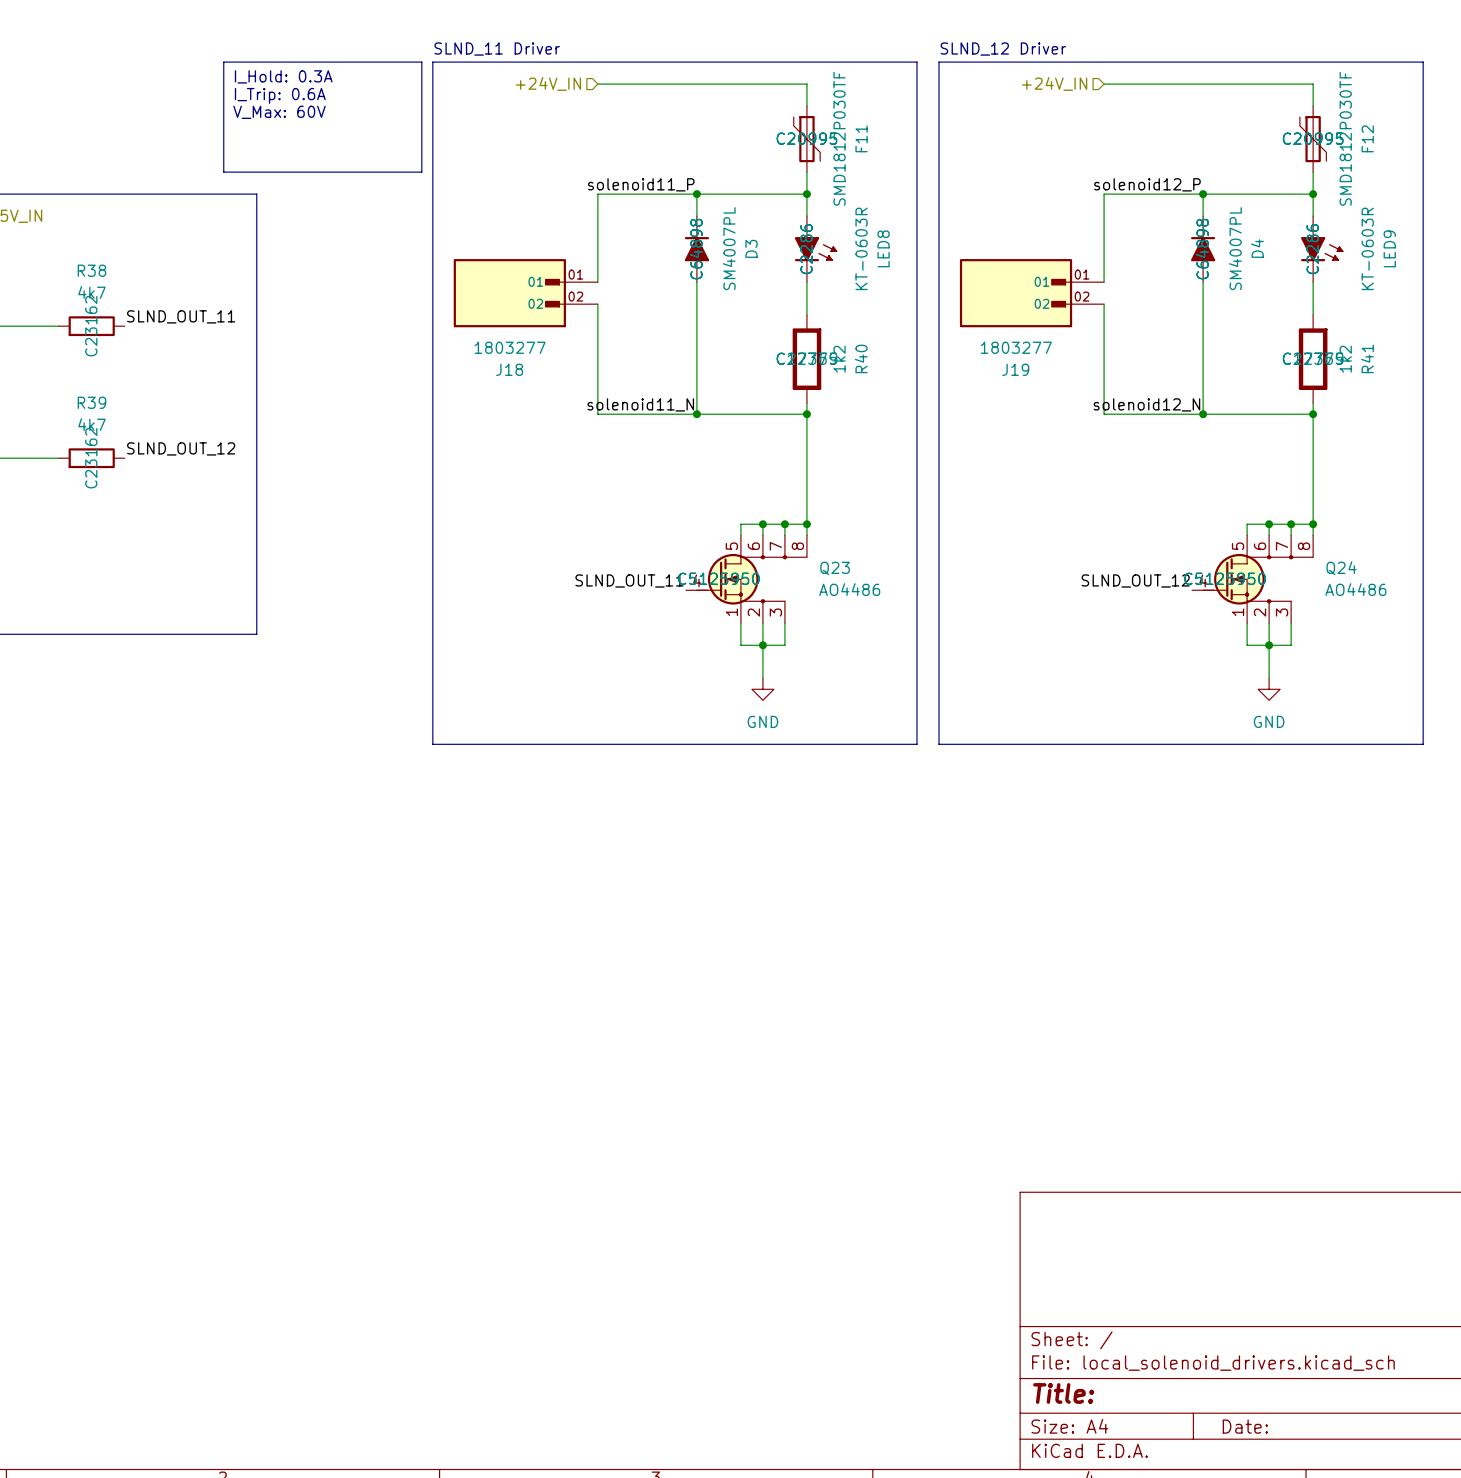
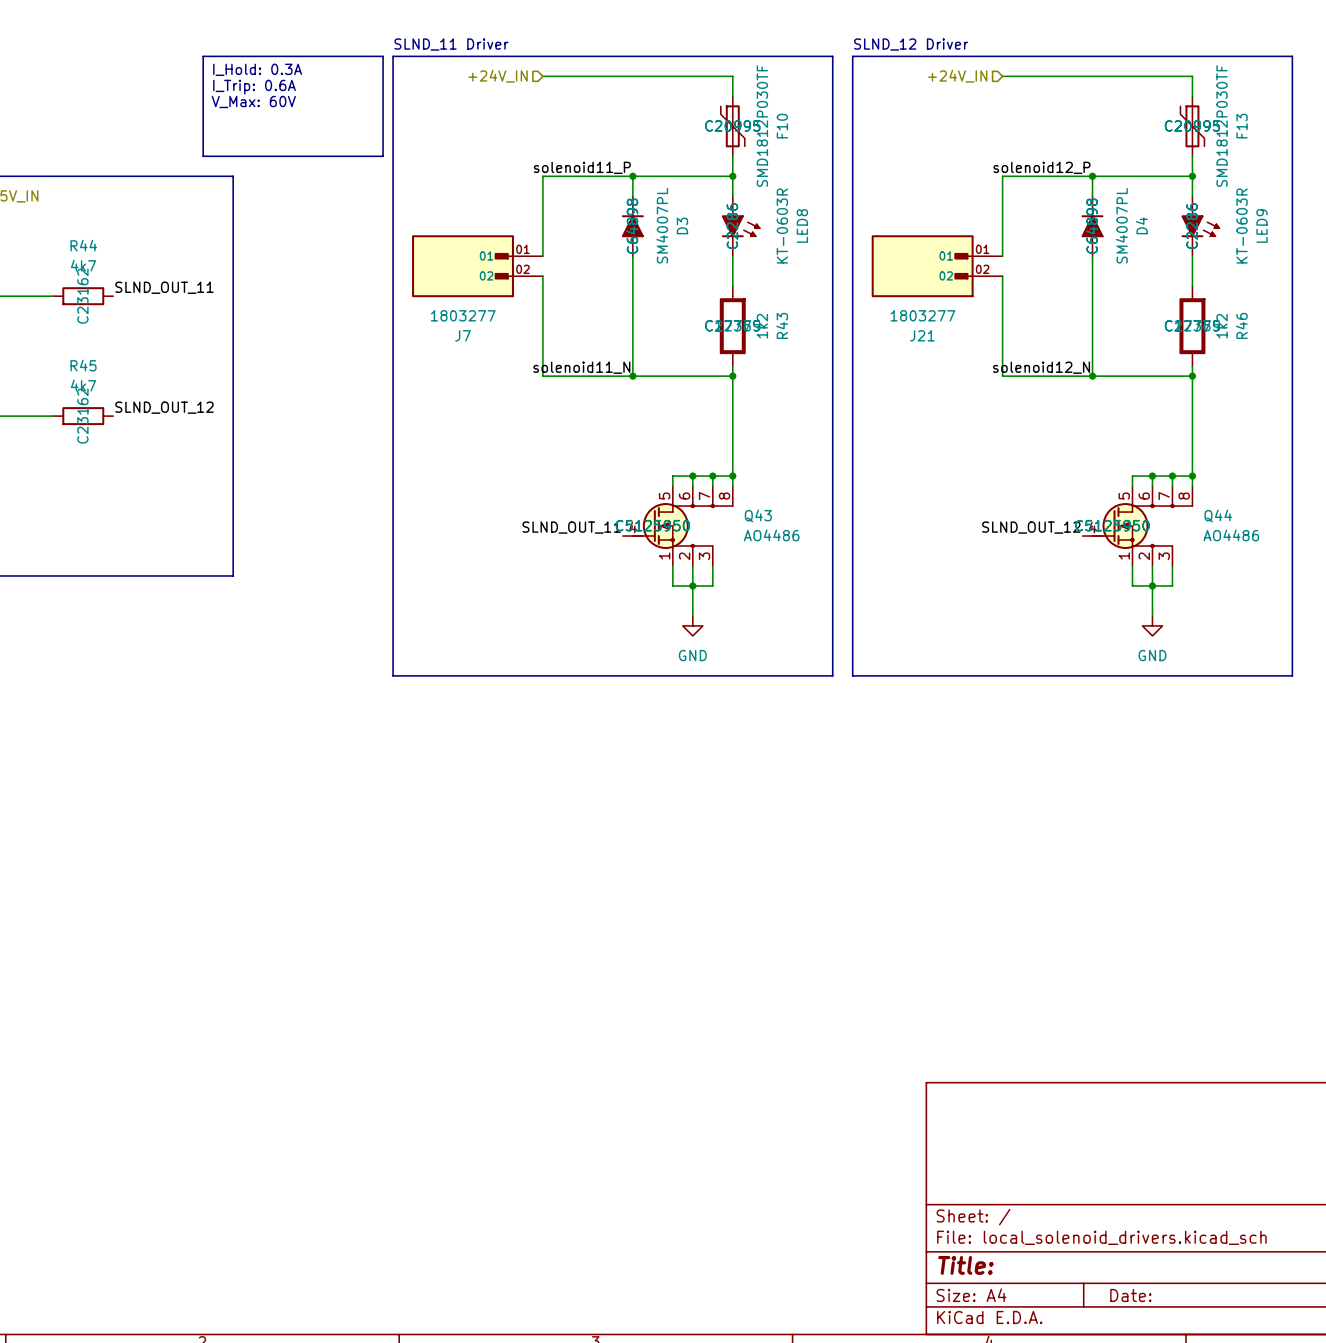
F11 name: F11 (861, 138) -> F10 (782, 126)
F12 name: F12 (1367, 138) -> F13 (1242, 126)
R38 name: R38 (91, 270) -> R44 (83, 245)
R40 name: R40 (861, 358) -> R43 (782, 325)
R41 name: R41 (1367, 358) -> R46 (1241, 325)
J18 name: J18 (509, 369) -> J7 (462, 335)
J19 name: J19 (1015, 369) -> J21 (922, 335)
R39 name: R39 (91, 402) -> R45 (83, 365)
Q23 name: Q23 (835, 568) -> Q43 (758, 515)
Q24 name: Q24 (1341, 568) -> Q44 (1218, 515)

